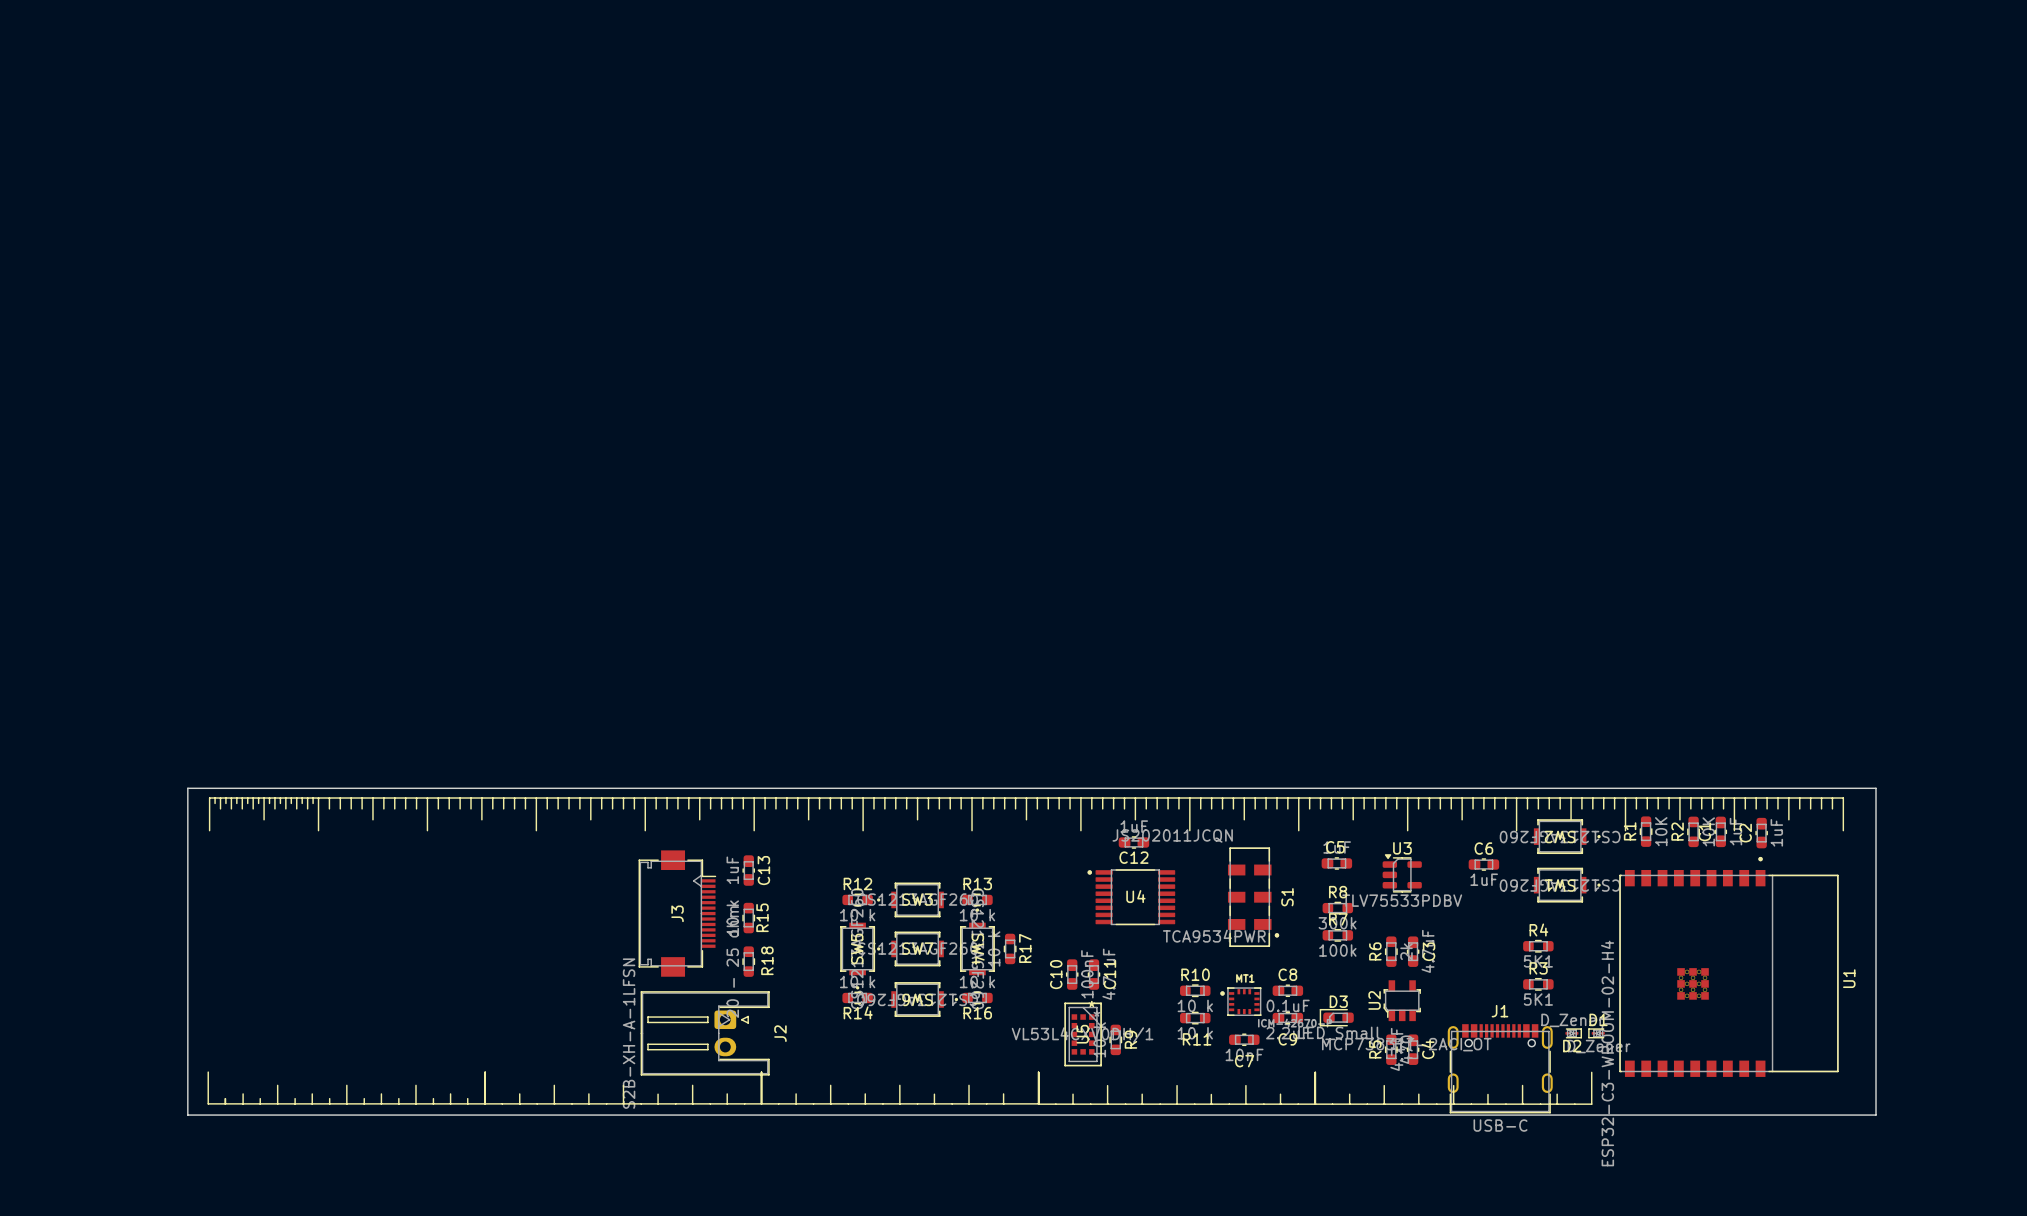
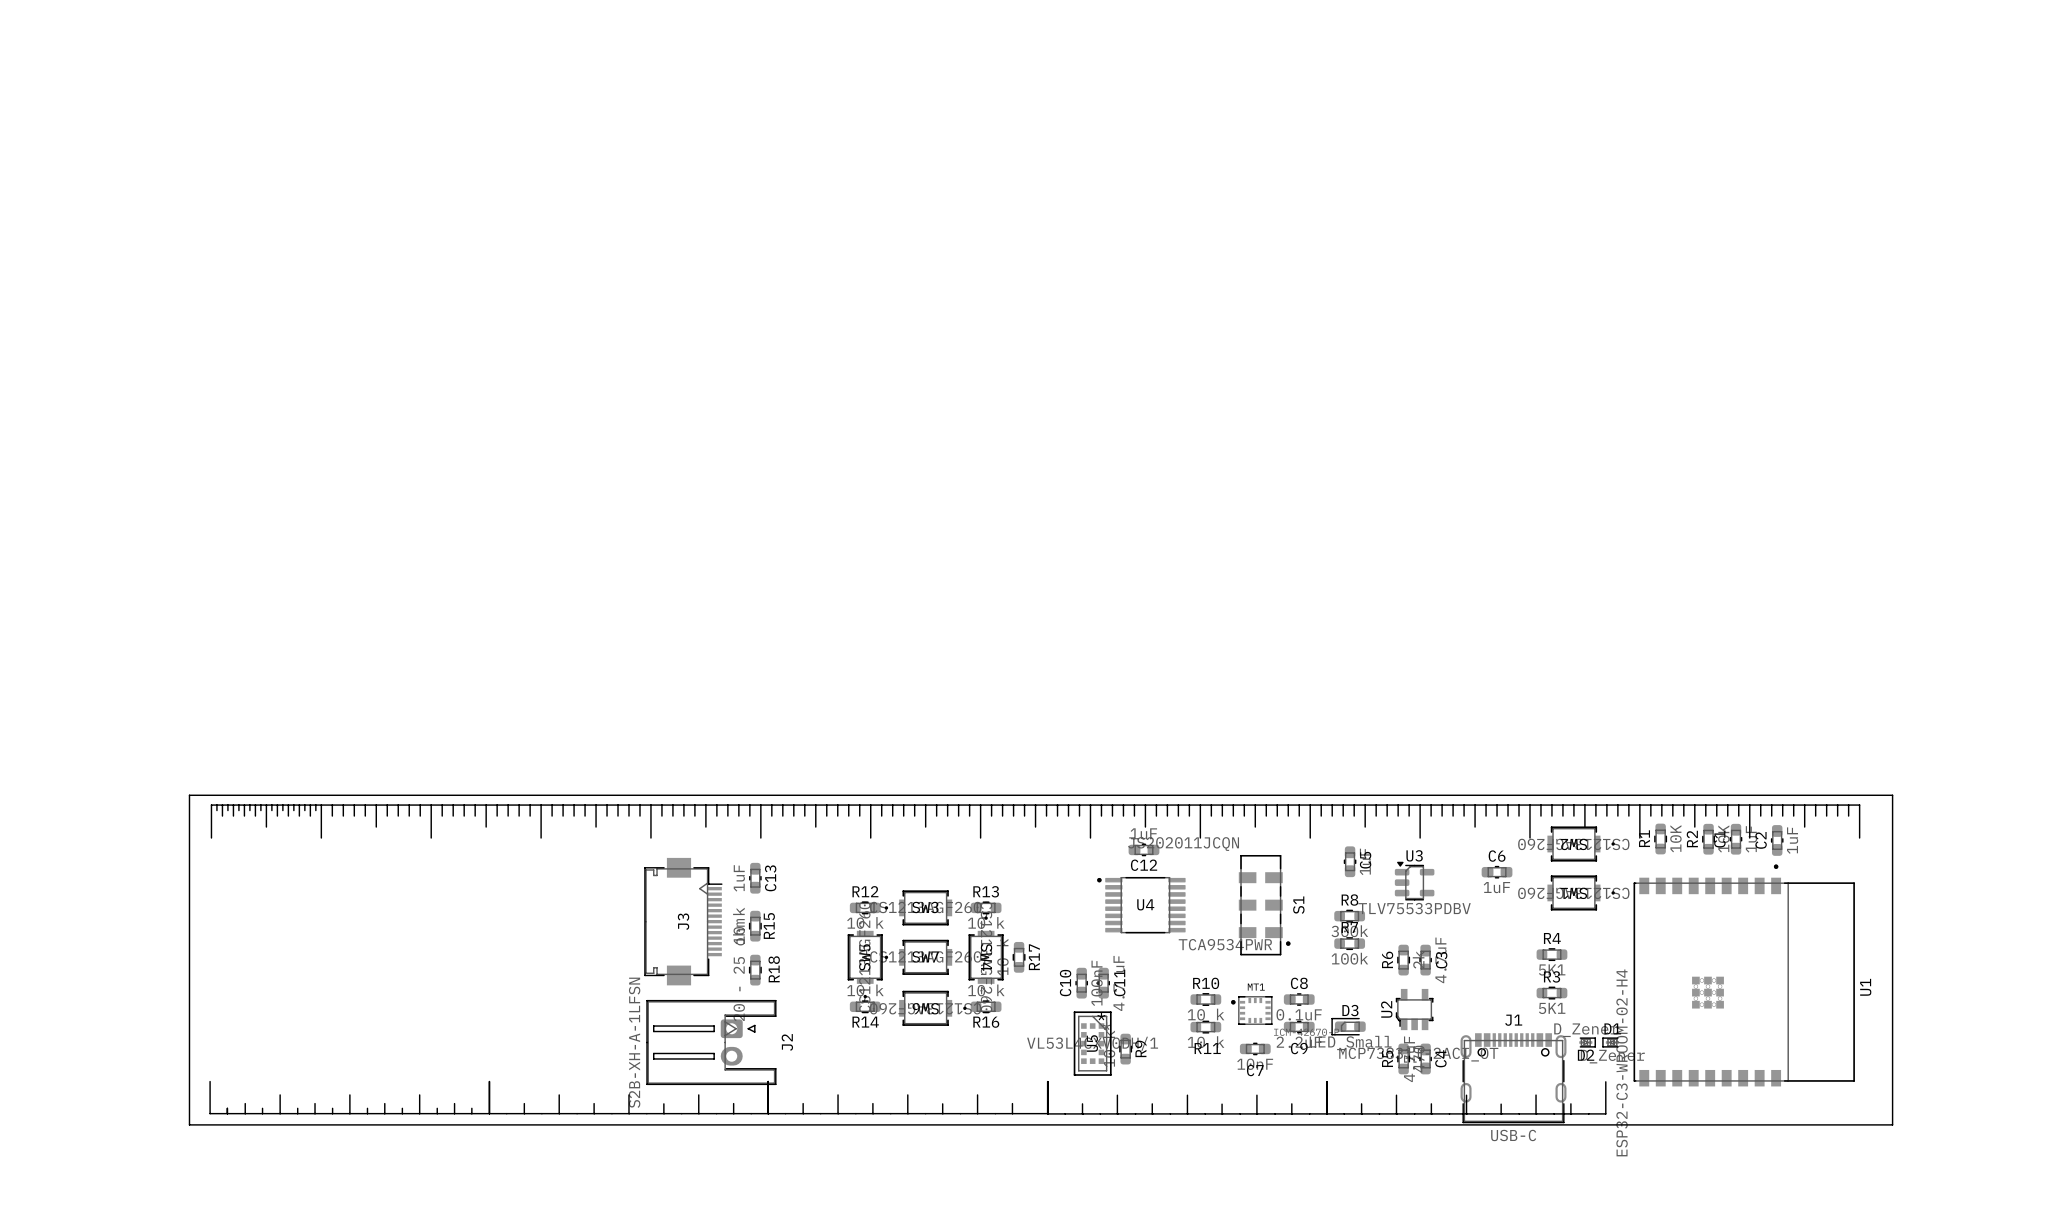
C5 rotation: 0° (1336, 863) -> 90° clockwise (1350, 861)

